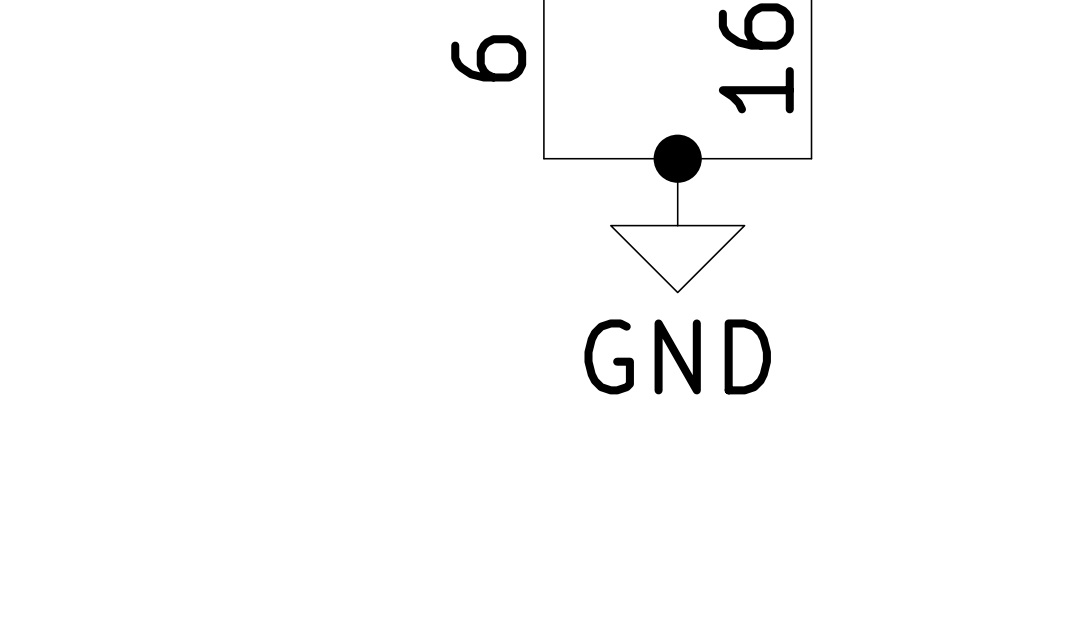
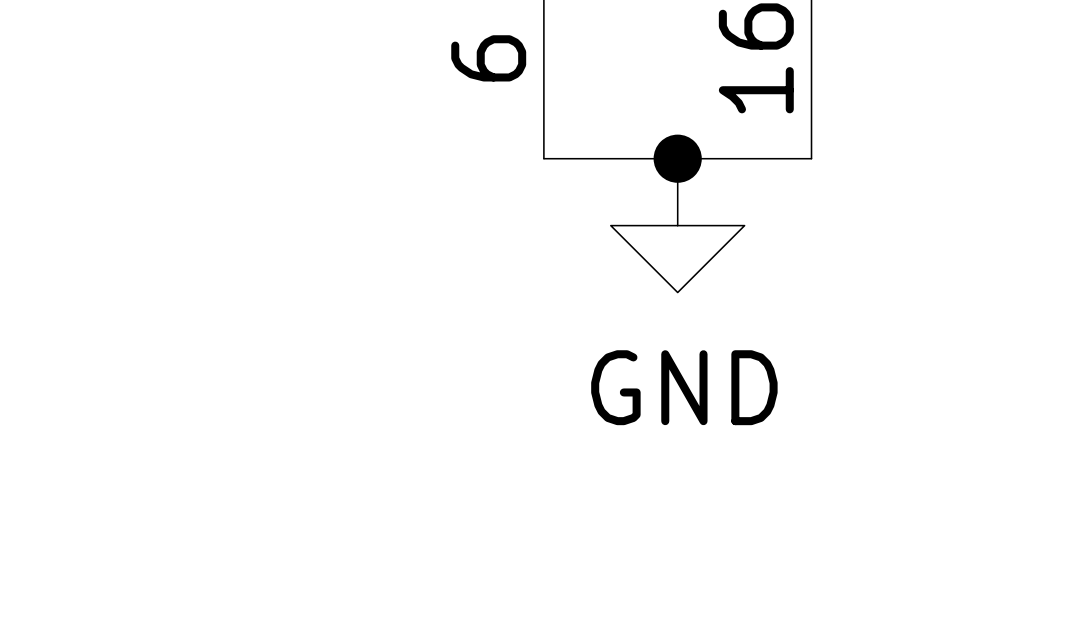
power symbol text position: GND (677, 356) -> GND (684, 387)

